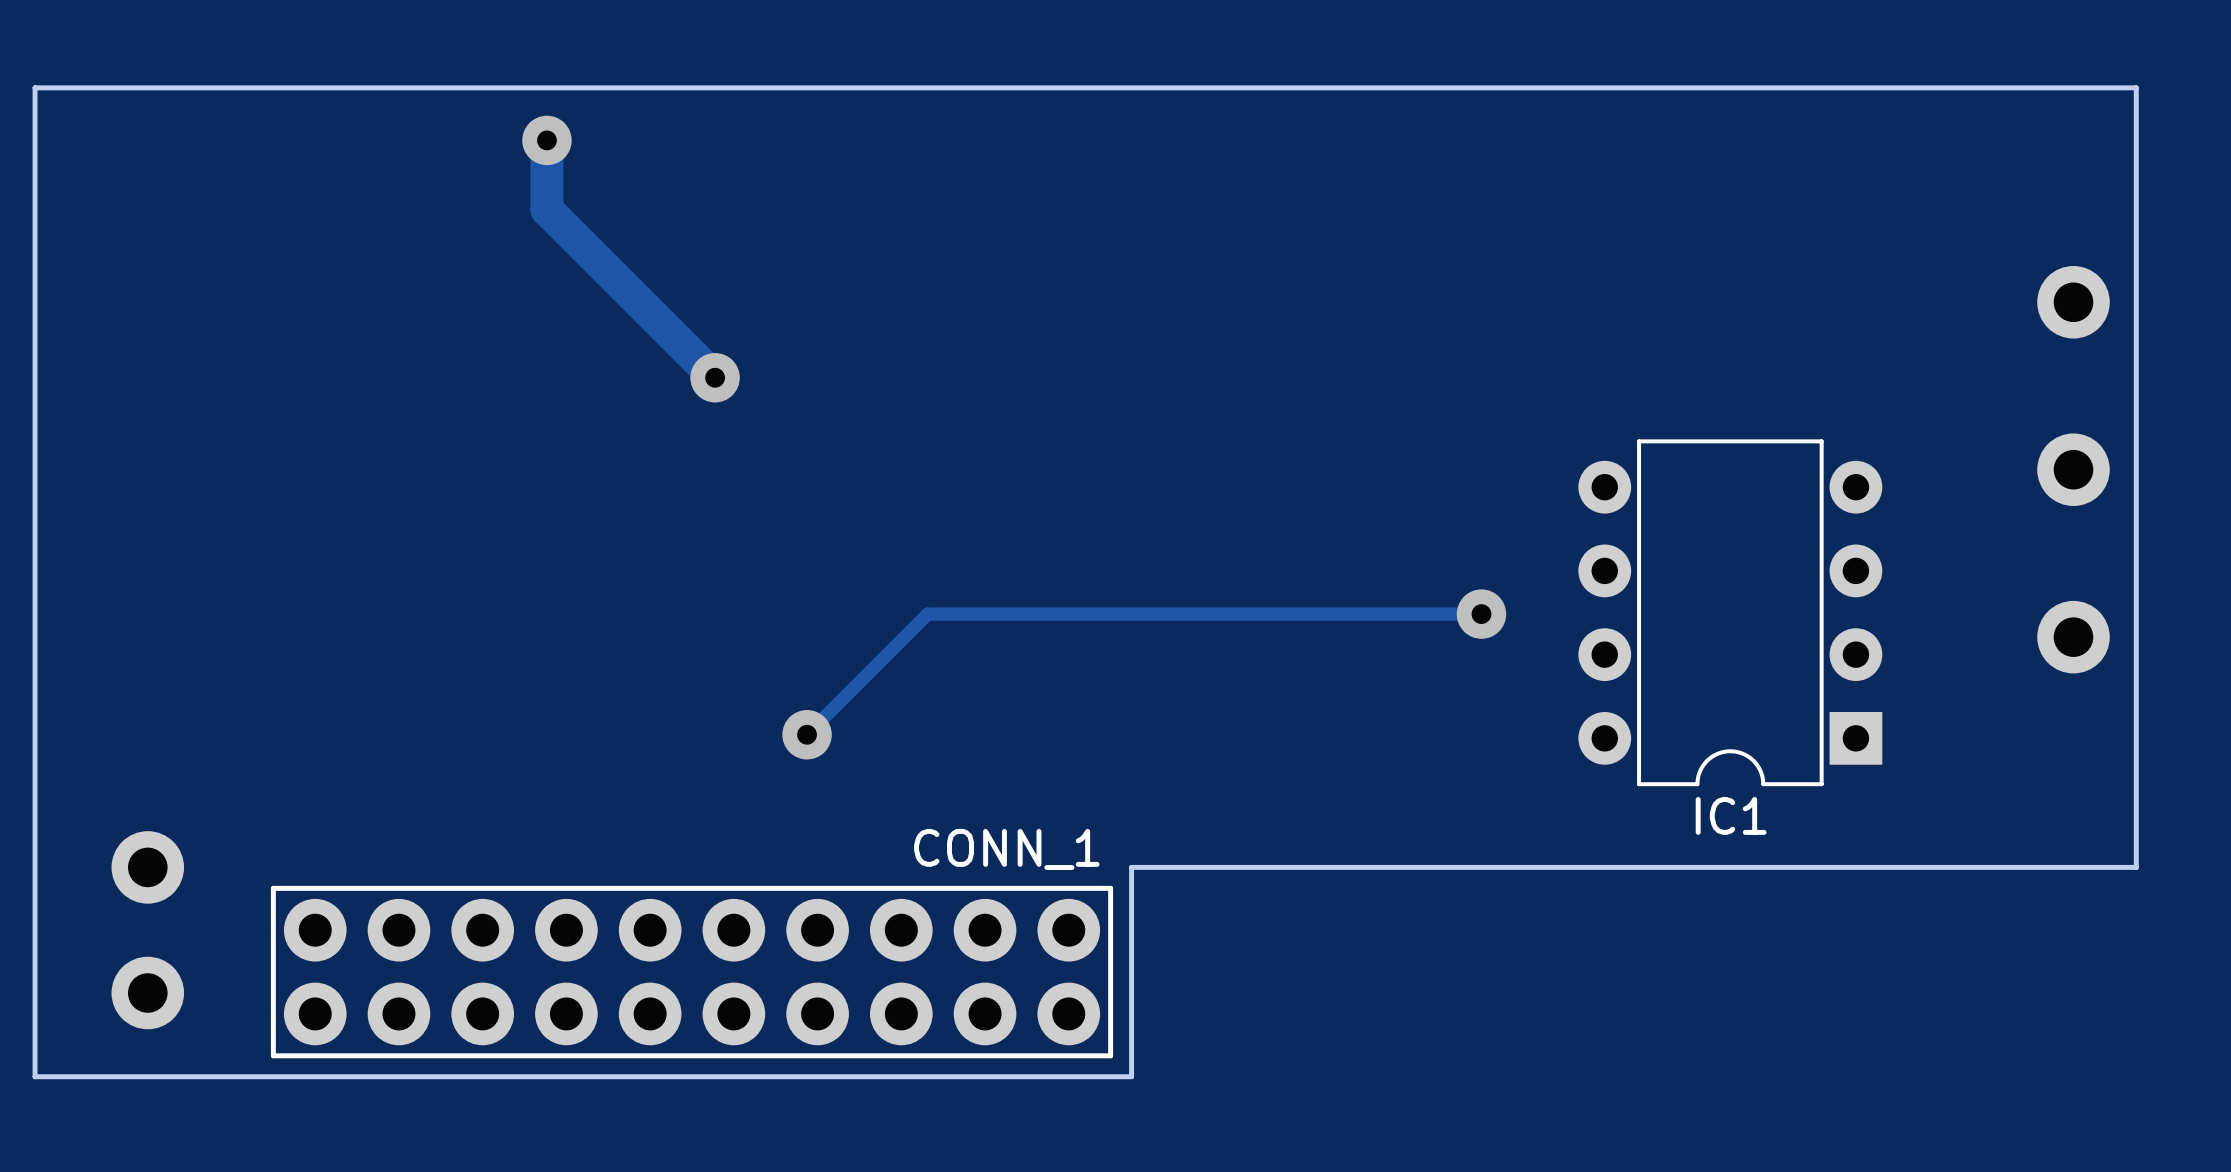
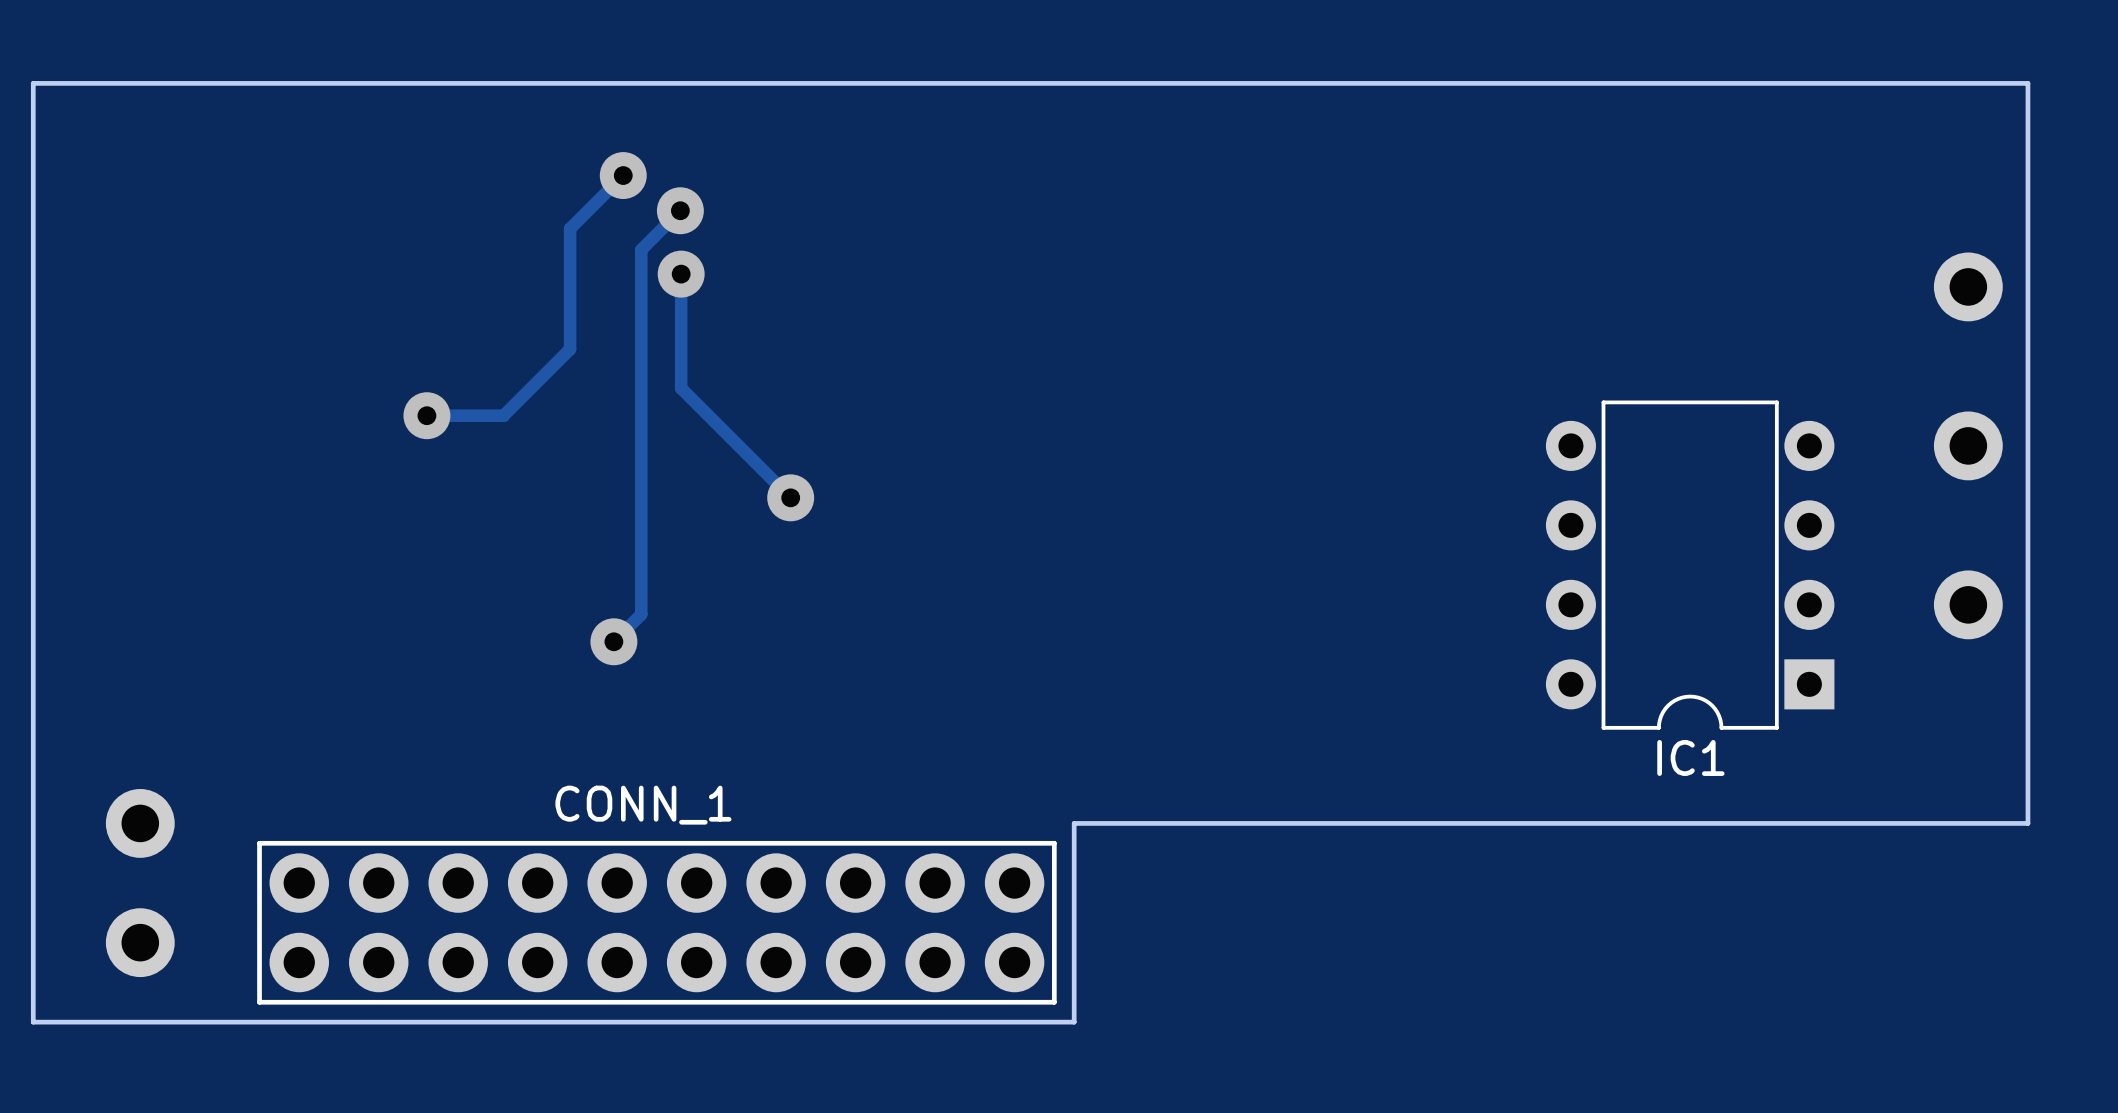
track: (546, 140) (546, 209) (715, 377) -> none
via: (546, 140) -> none
track: none -> (623, 175) (570, 228) (570, 349) (503, 415) (426, 415)
via: none -> (623, 175)
track: none -> (680, 210) (641, 249) (641, 614) (613, 641)
via: none -> (680, 210)
track: none -> (681, 274) (681, 388) (790, 497)
via: none -> (681, 274)
via: (715, 377) -> none
via: none -> (426, 415)
via: none -> (790, 497)
IC1 position: (1730, 612) -> (1690, 565)
track: (1481, 614) (927, 614) (807, 734) -> none
via: (1481, 614) -> none
via: none -> (613, 641)
via: (807, 734) -> none
CONN_1 name position: CONN_1 (1006, 849) -> CONN_1 (643, 805)

